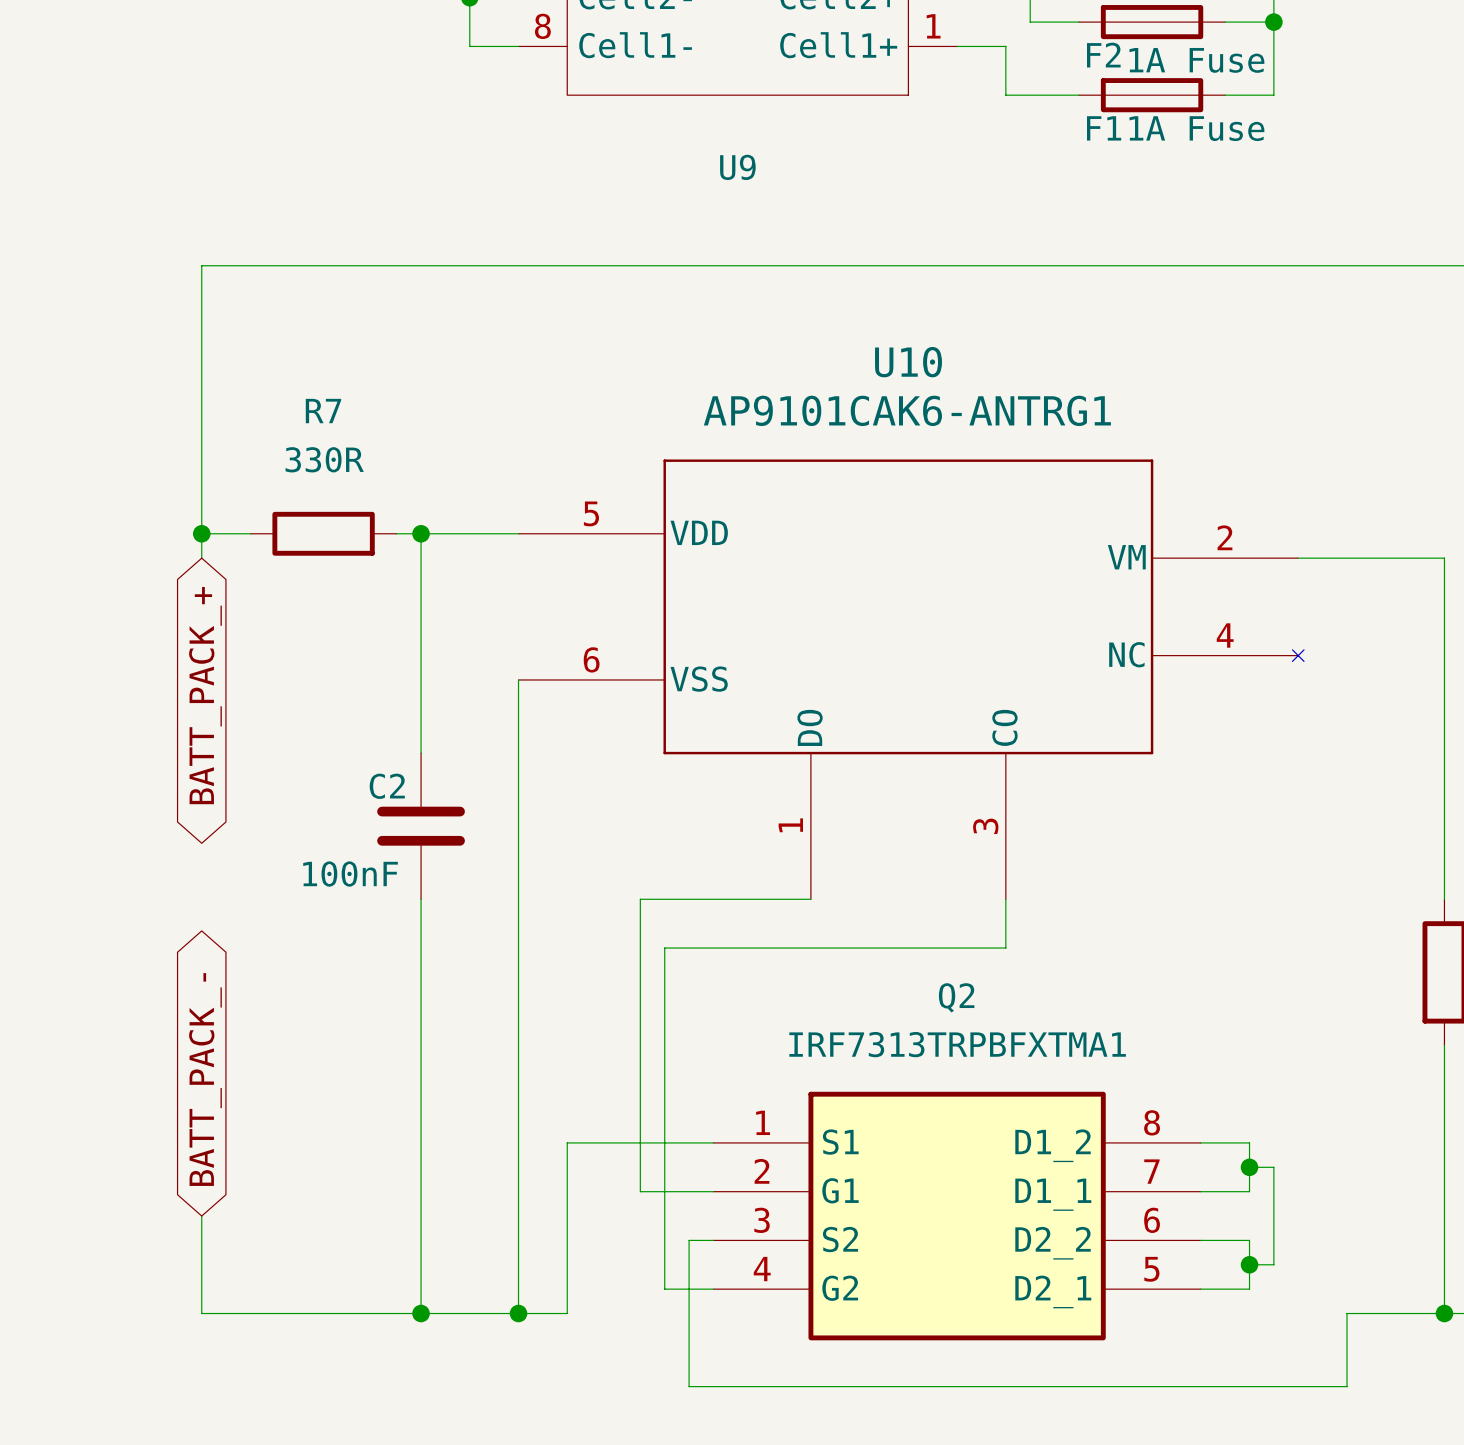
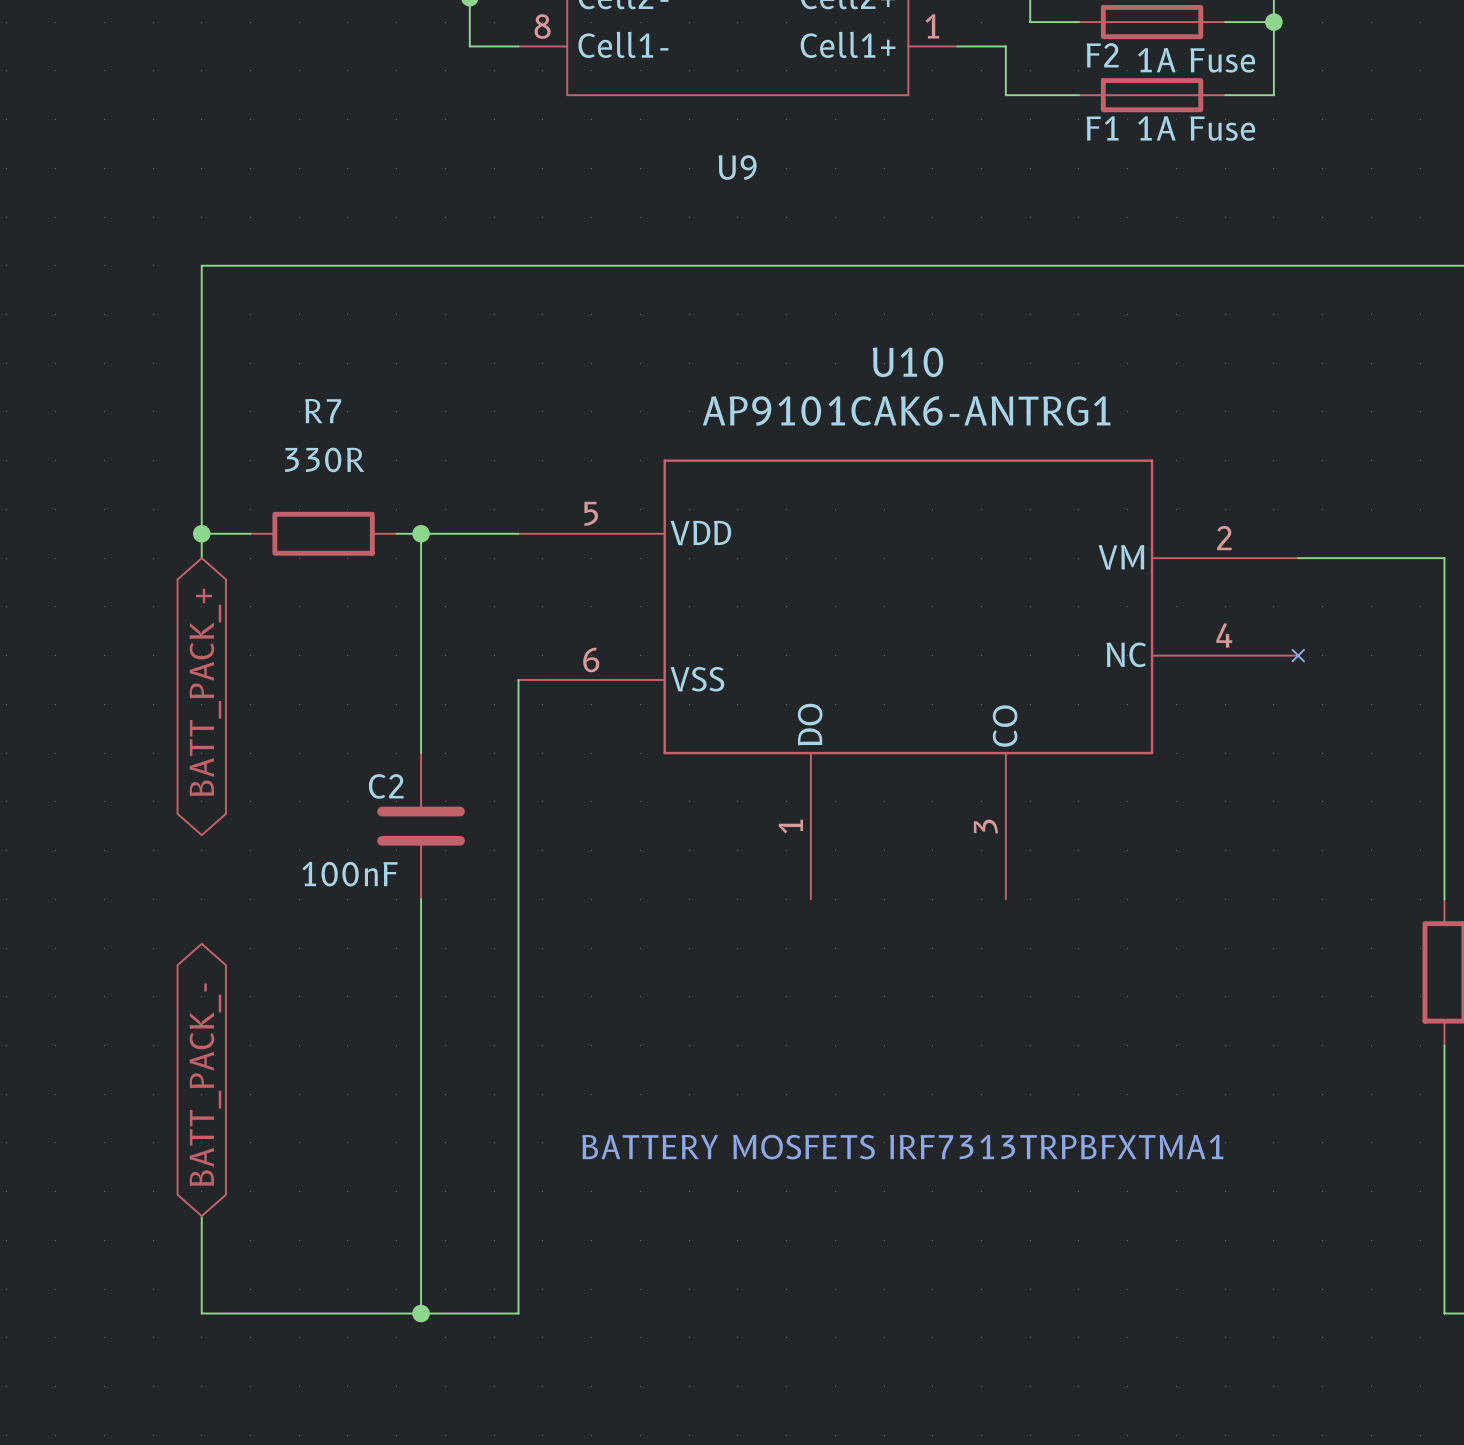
wire: (810, 899) (640, 899) (640, 1191) (713, 1191) -> none
wire: (1005, 899) (1005, 948) (664, 948) (664, 1289) (713, 1289) -> none
wire: (713, 1142) (567, 1142) (567, 1313) (518, 1313) -> none
wire: (1200, 1142) (1249, 1142) (1249, 1191) (1200, 1191) -> none
text: none -> BATTERY MOSFETS IRF7313TRPBFXTMA1 (902, 1147)
wire: (1249, 1167) (1273, 1167) (1273, 1264) (1249, 1264) -> none
junction: (1249, 1167) -> none
Q2: IRF7313TRPBFXTMA1 (957, 1216) -> none
wire: (713, 1240) (689, 1240) (689, 1386) (1346, 1386) (1346, 1313) (1444, 1313) -> none
wire: (1200, 1240) (1249, 1240) (1249, 1289) (1200, 1289) -> none
junction: (1249, 1264) -> none
junction: (518, 1313) -> none
junction: (1444, 1313) -> none

